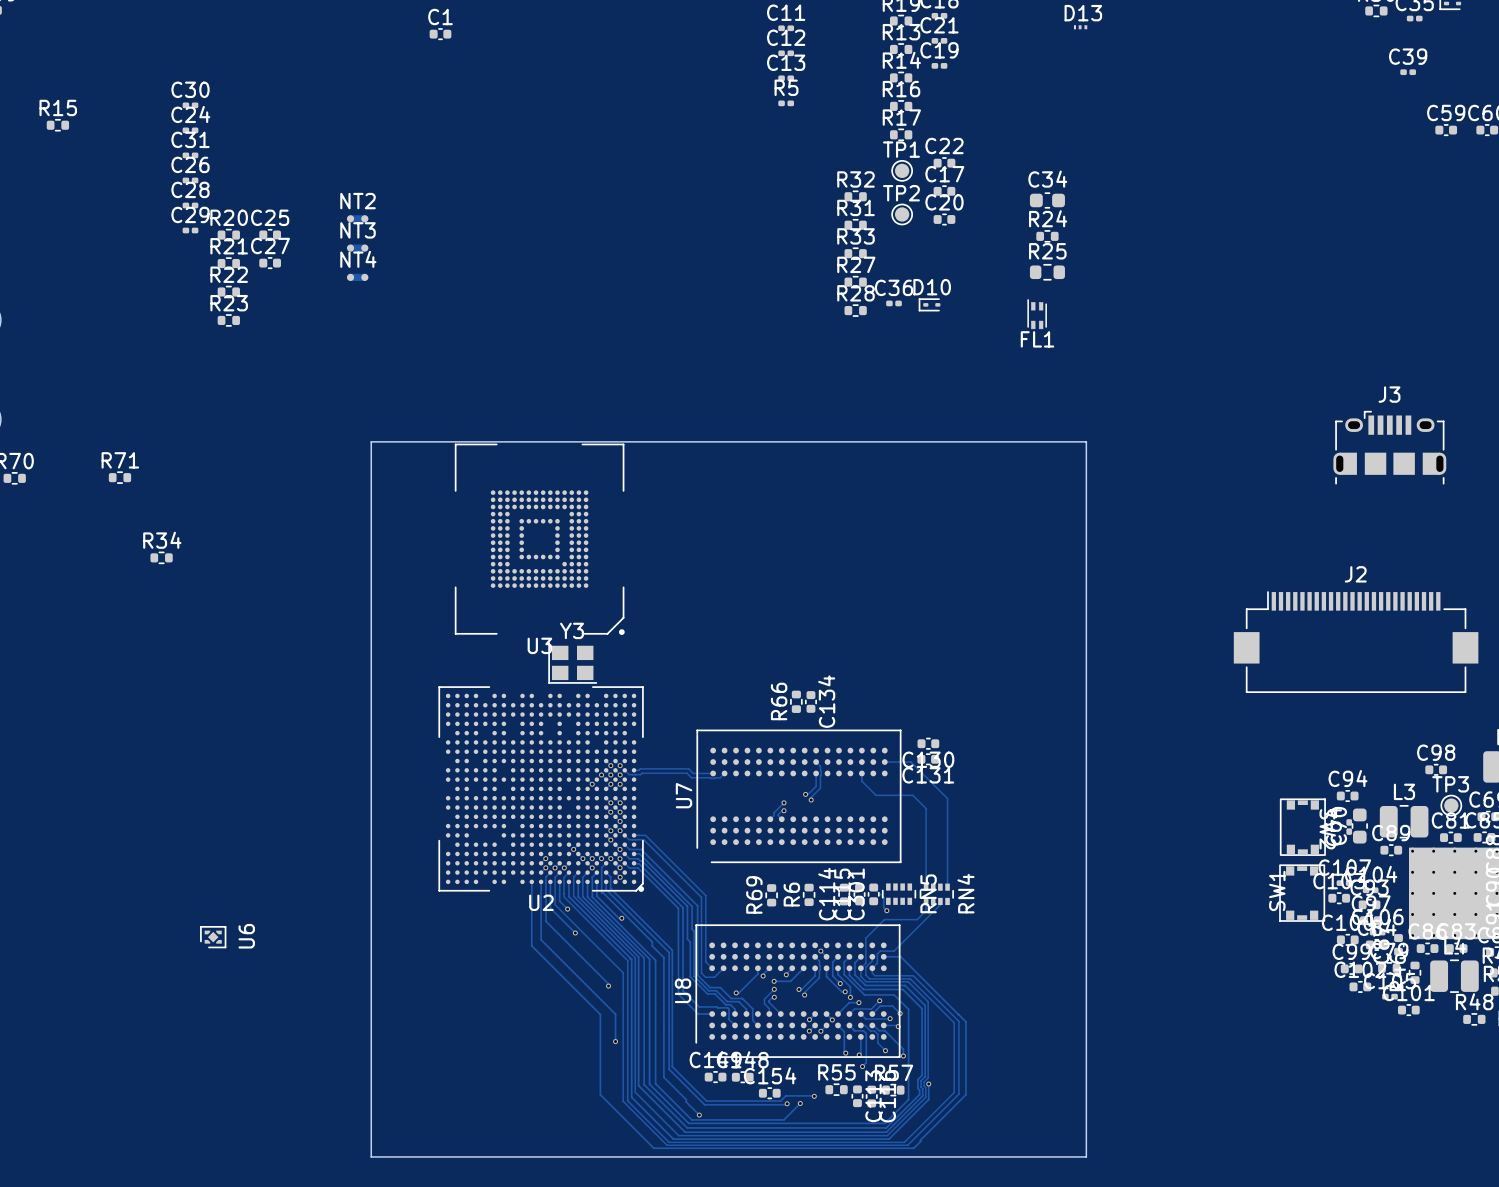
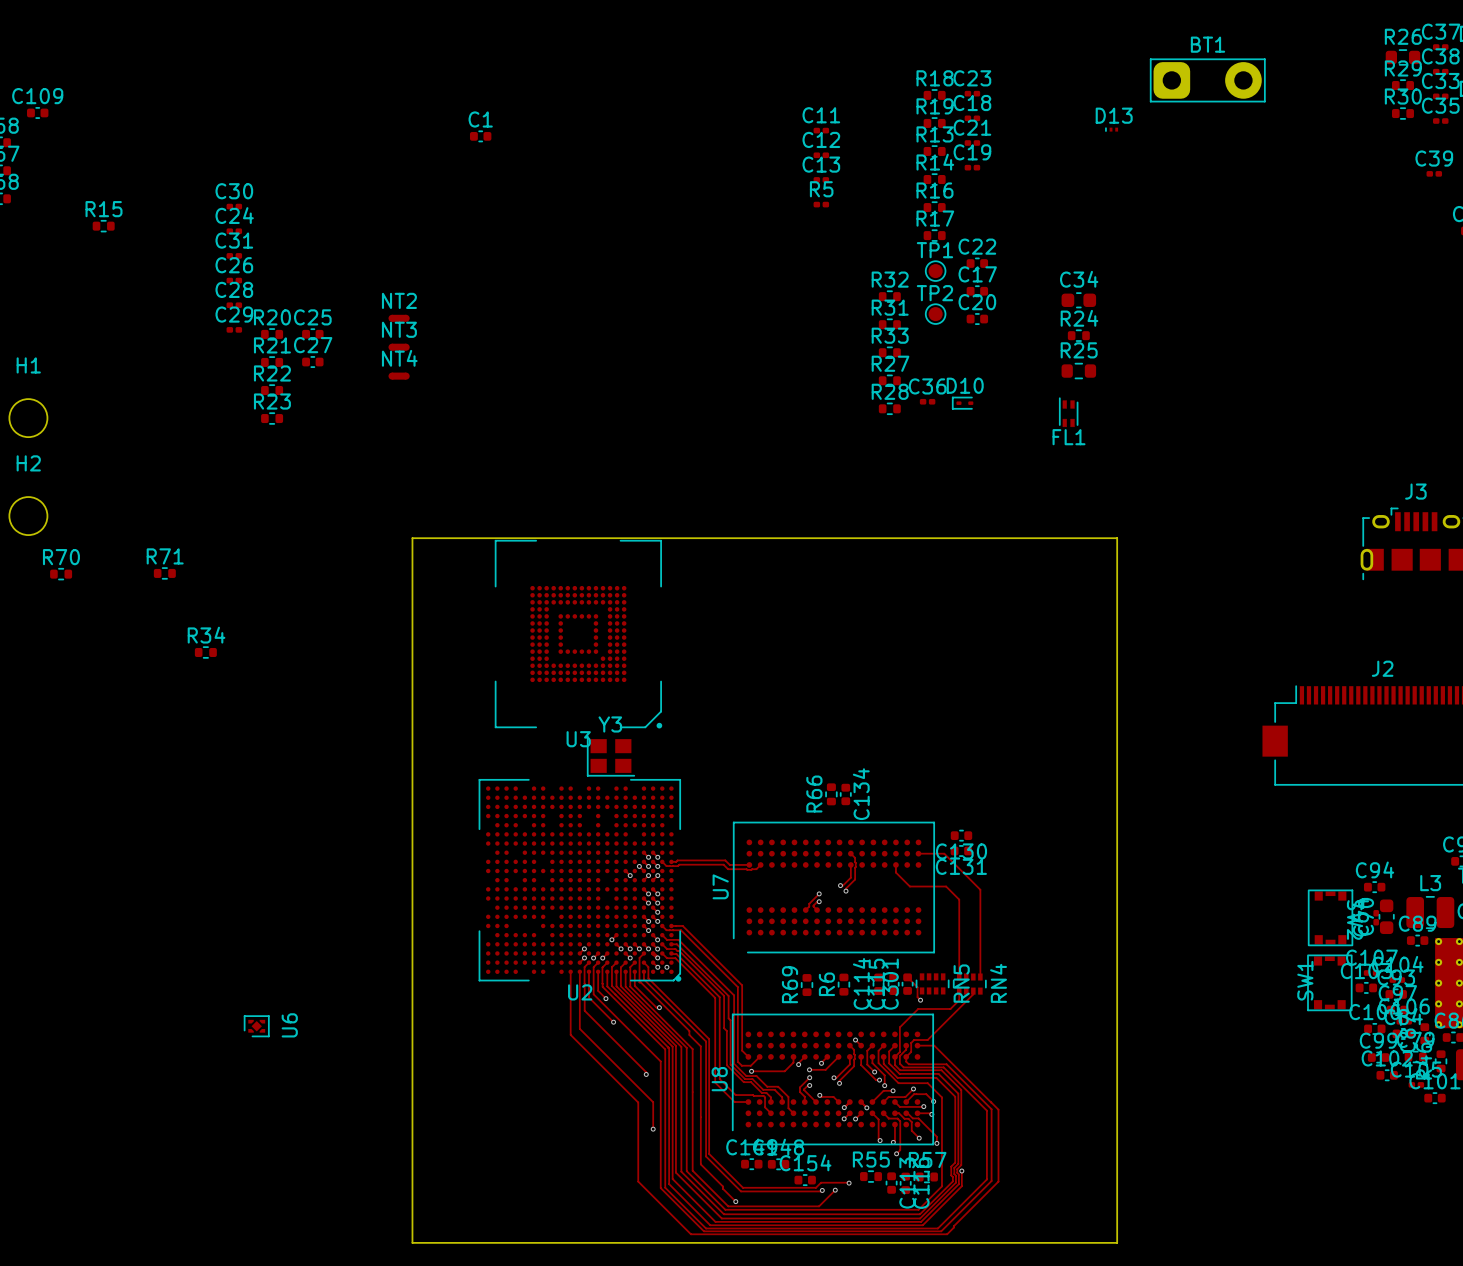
via: none -> (666, 967)
track: (749, 982) (738, 992) (736, 992) -> (784, 1071) (751, 1071)
via position: (736, 992) -> (751, 1071)
track: none -> (819, 1095) (833, 1096) (838, 1102)
via: none -> (819, 1095)

